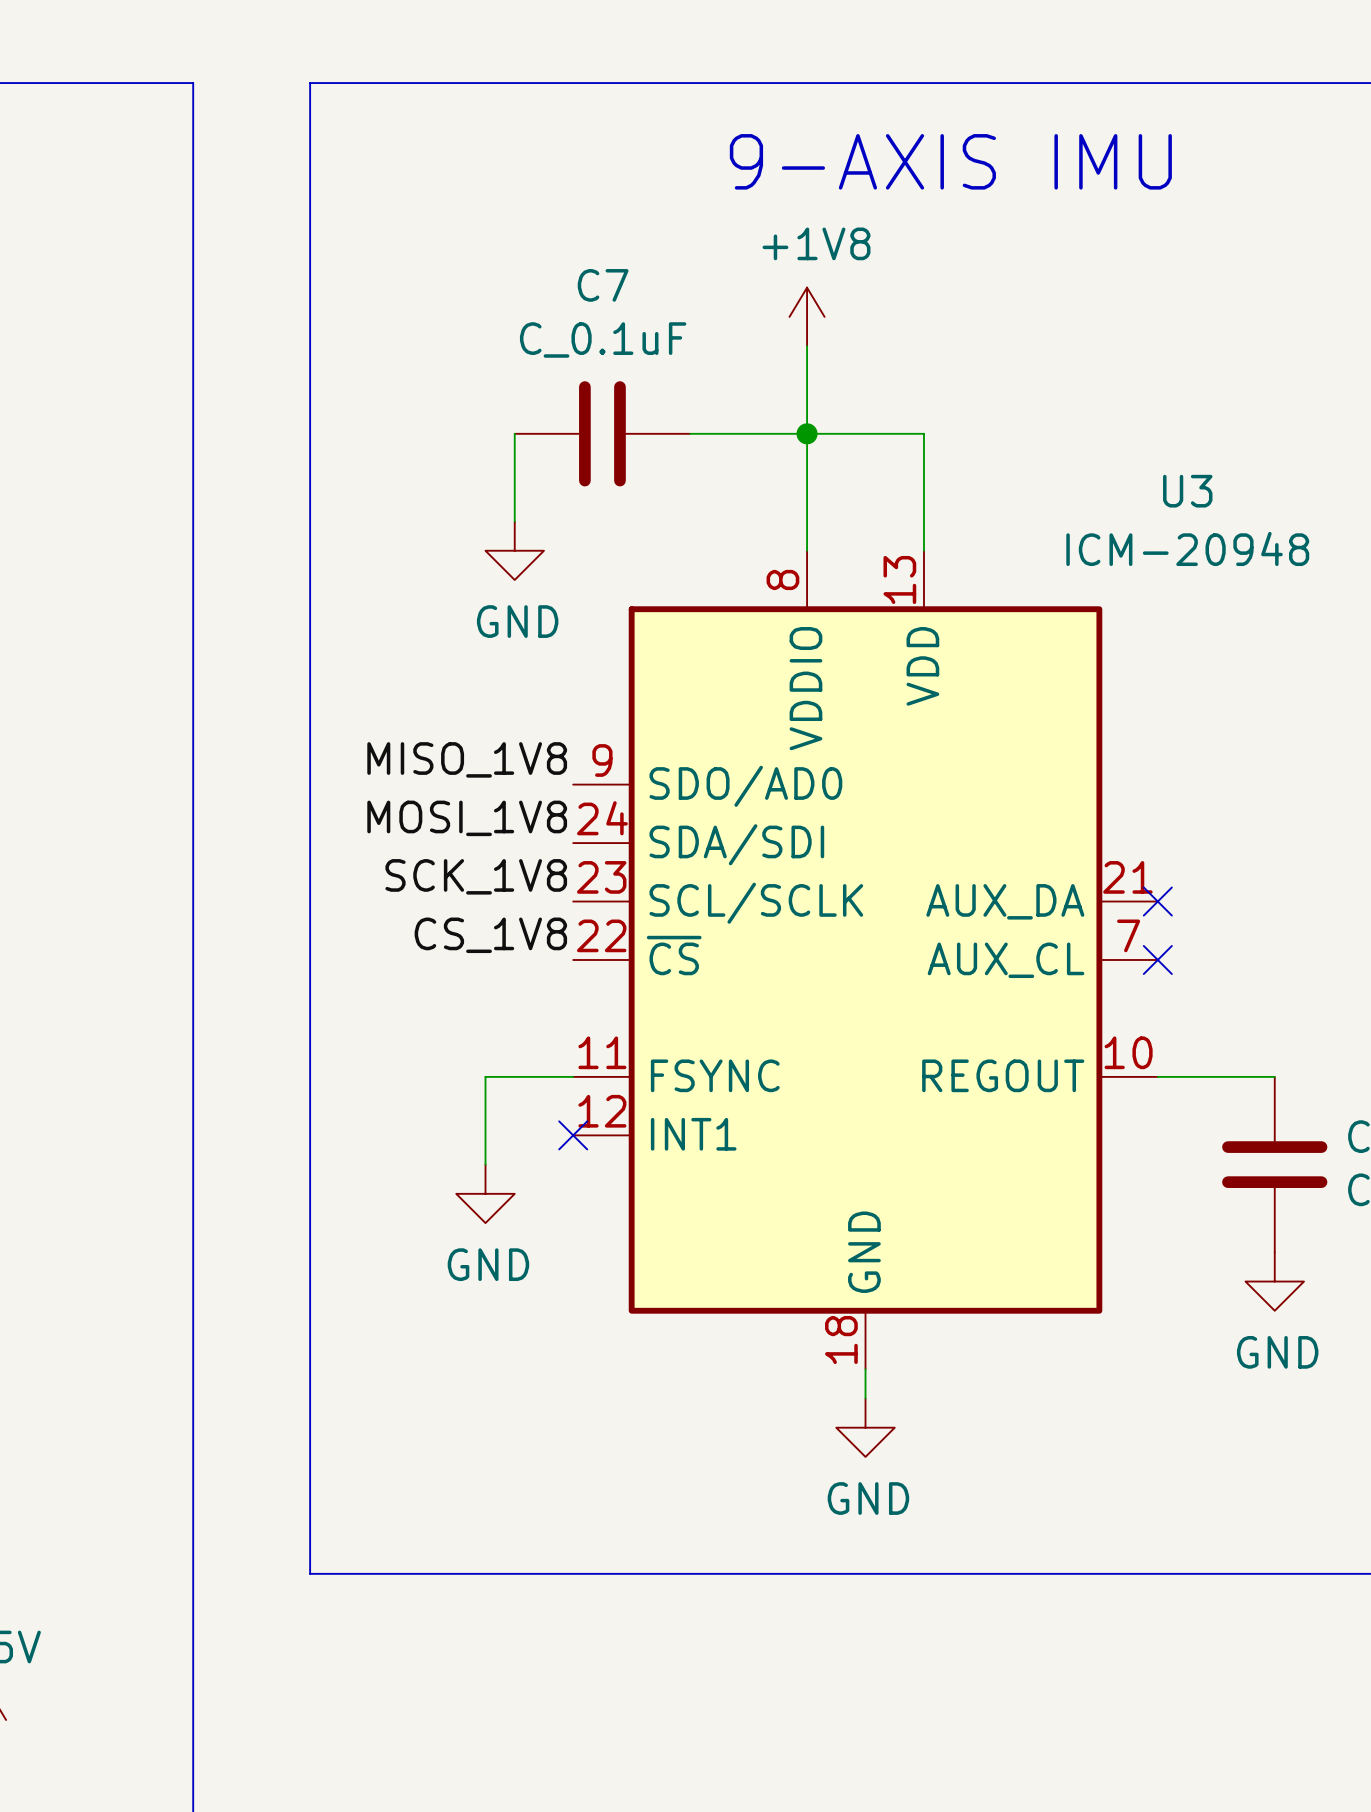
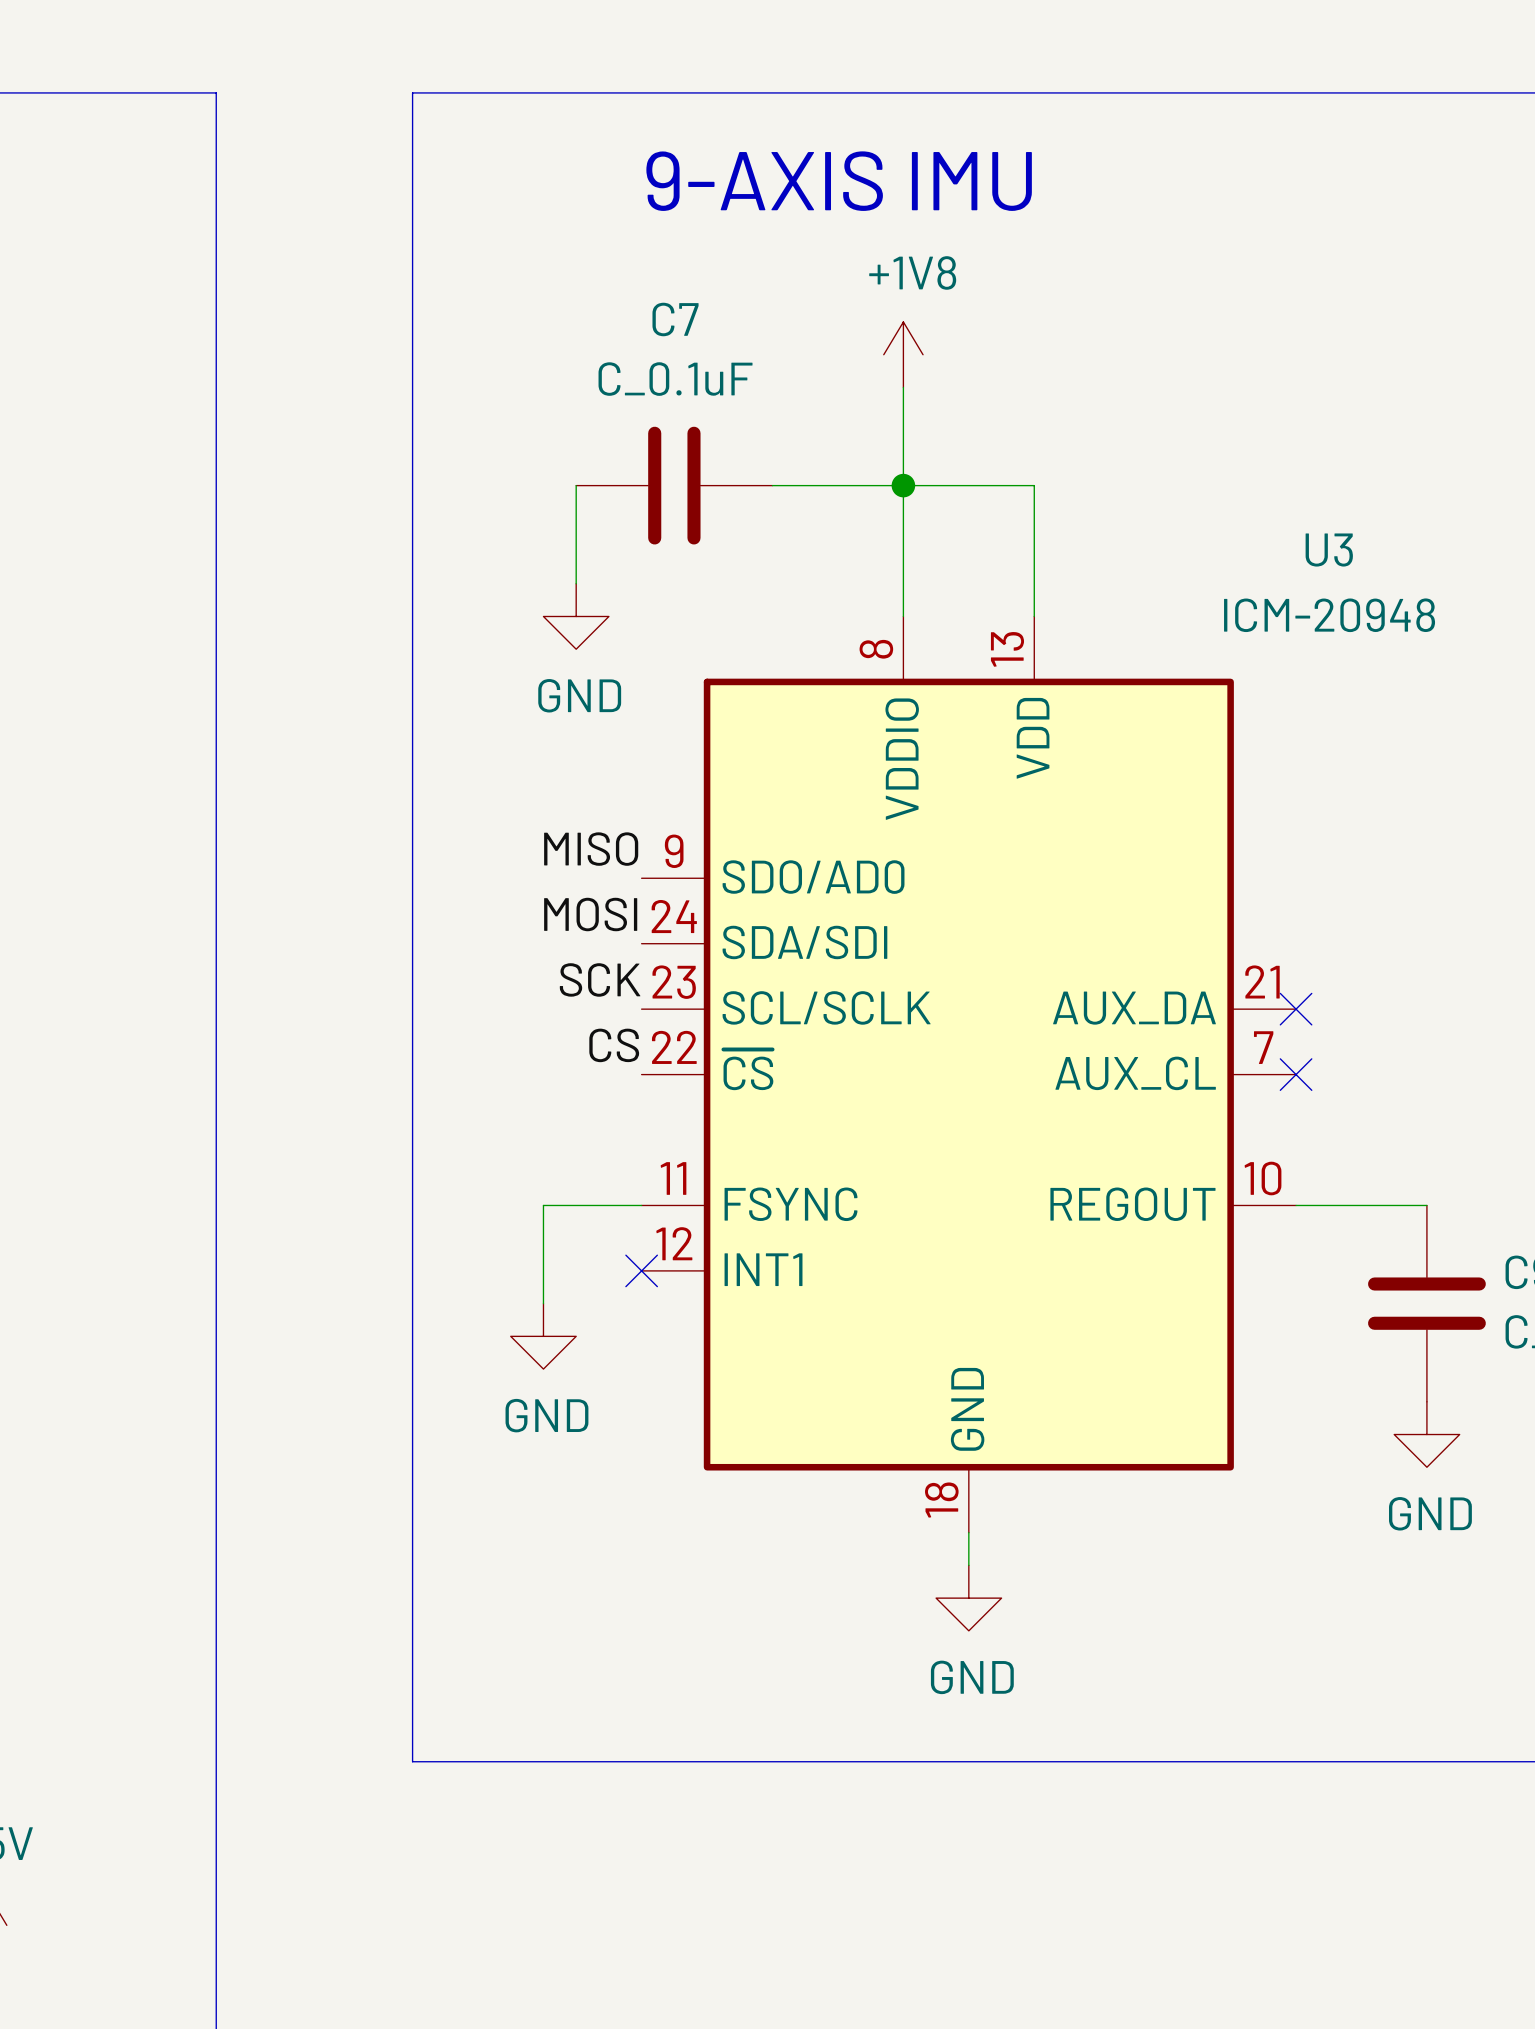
line: (368, 83) (310, 83) (310, 1573) (368, 1573) -> (412, 92) (412, 1761)
text position: 9-AXIS IMU (950, 161) -> 9-AXIS IMU (839, 181)
label: MISO_1V8 (467, 759) -> MISO (591, 849)
label: MOSI_1V8 (467, 818) -> MOSI (590, 914)
label: SCK_1V8 (476, 876) -> SCK (600, 979)
label: CS_1V8 (490, 935) -> CS (614, 1045)

